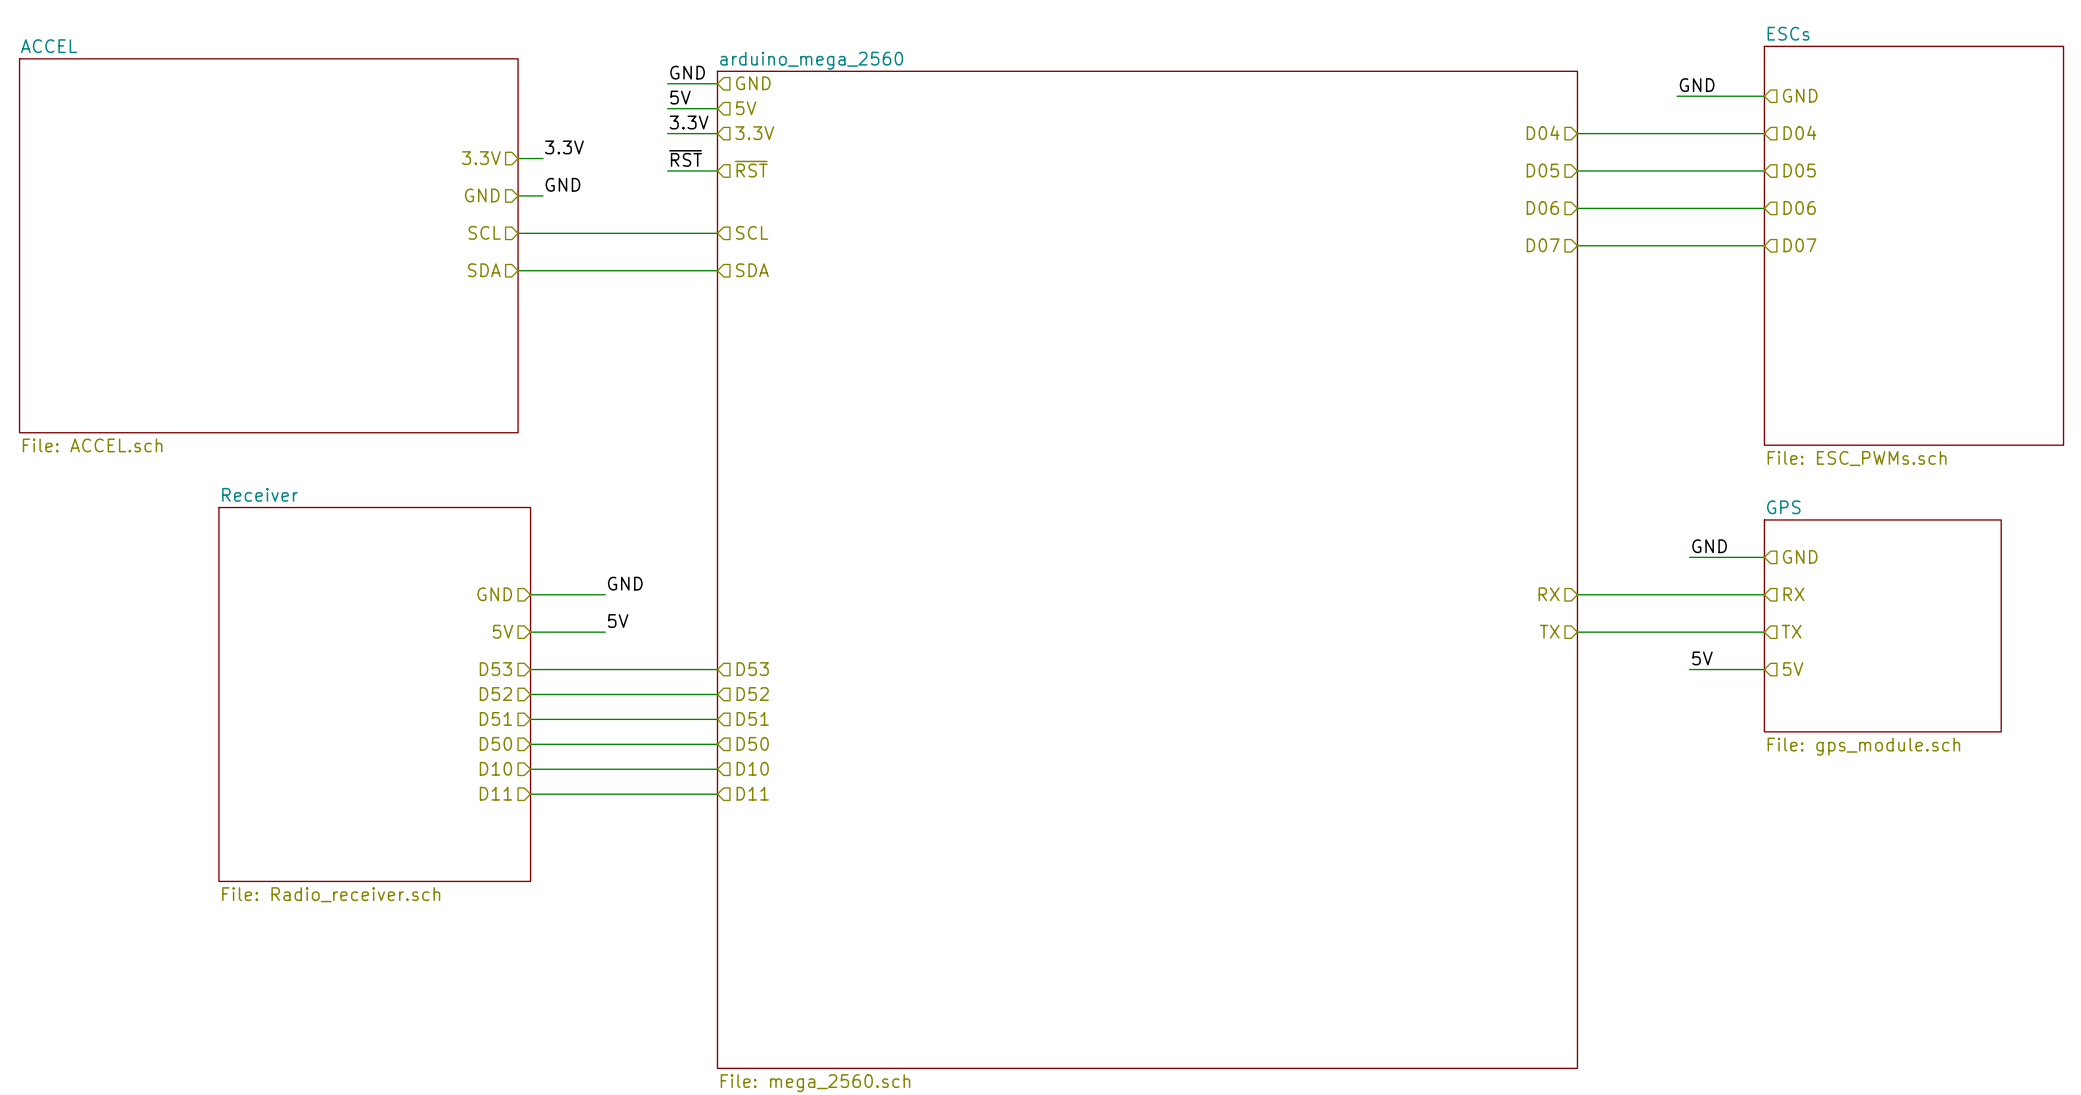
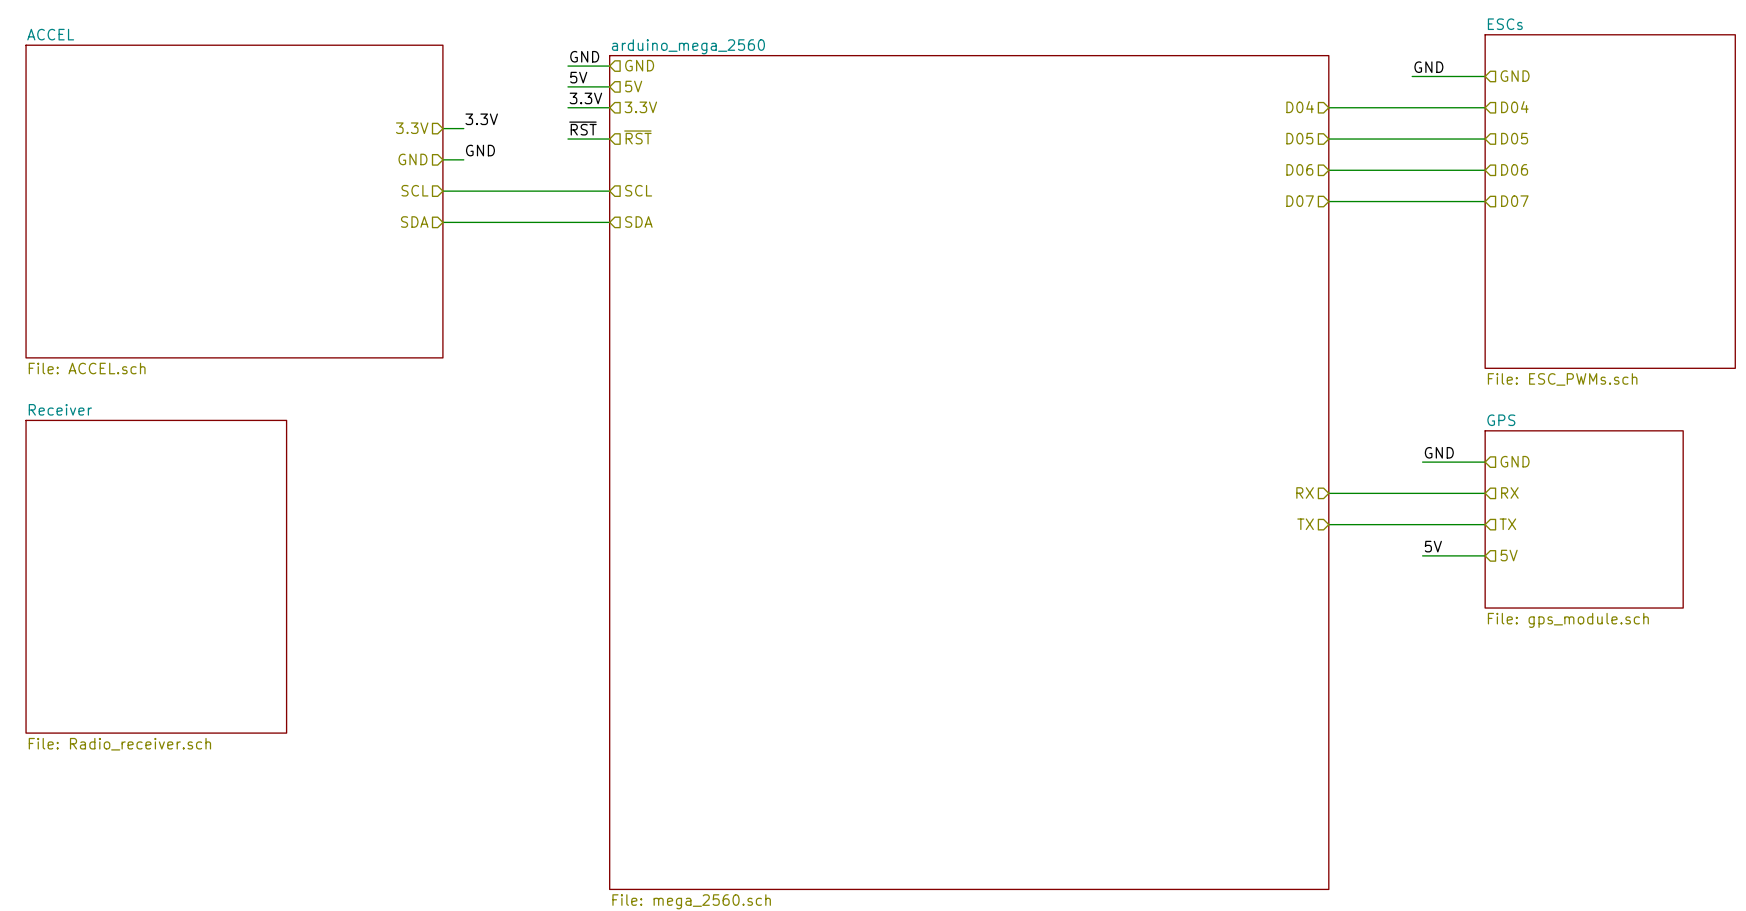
label: GND (625, 583) -> none
hierarchical label: GND (494, 594) -> none
wire: (530, 594) (605, 594) -> none
label: 5V (618, 621) -> none
hierarchical label: 5V (503, 631) -> none
wire: (530, 632) (605, 632) -> none
hierarchical label: D53 (495, 669) -> none
wire: (530, 669) (717, 669) -> none
hierarchical label: D53 (752, 669) -> none
sheet Receiver position: (374, 694) -> (156, 576)
hierarchical label: D52 (495, 694) -> none
wire: (530, 694) (717, 694) -> none
hierarchical label: D52 (752, 694) -> none
hierarchical label: D51 (495, 718) -> none
hierarchical label: D51 (752, 718) -> none
wire: (530, 719) (717, 719) -> none
hierarchical label: D50 (495, 743) -> none
hierarchical label: D50 (752, 743) -> none
wire: (530, 744) (717, 744) -> none
hierarchical label: D10 (495, 768) -> none
hierarchical label: D10 (752, 768) -> none
wire: (530, 769) (717, 769) -> none
hierarchical label: D11 (495, 793) -> none
hierarchical label: D11 (752, 793) -> none
wire: (530, 794) (717, 794) -> none

